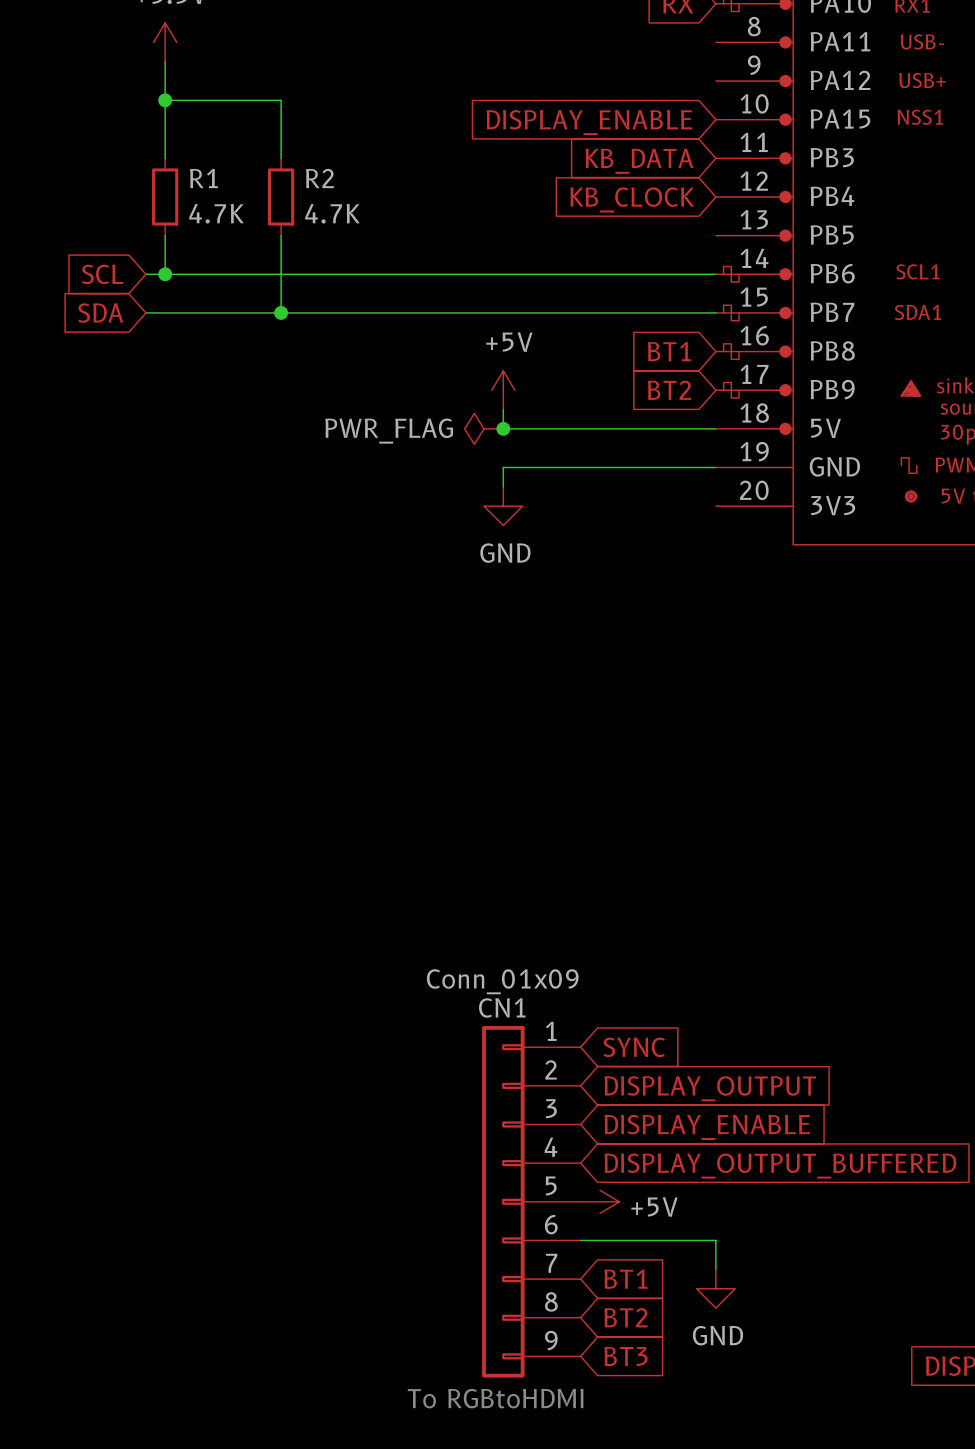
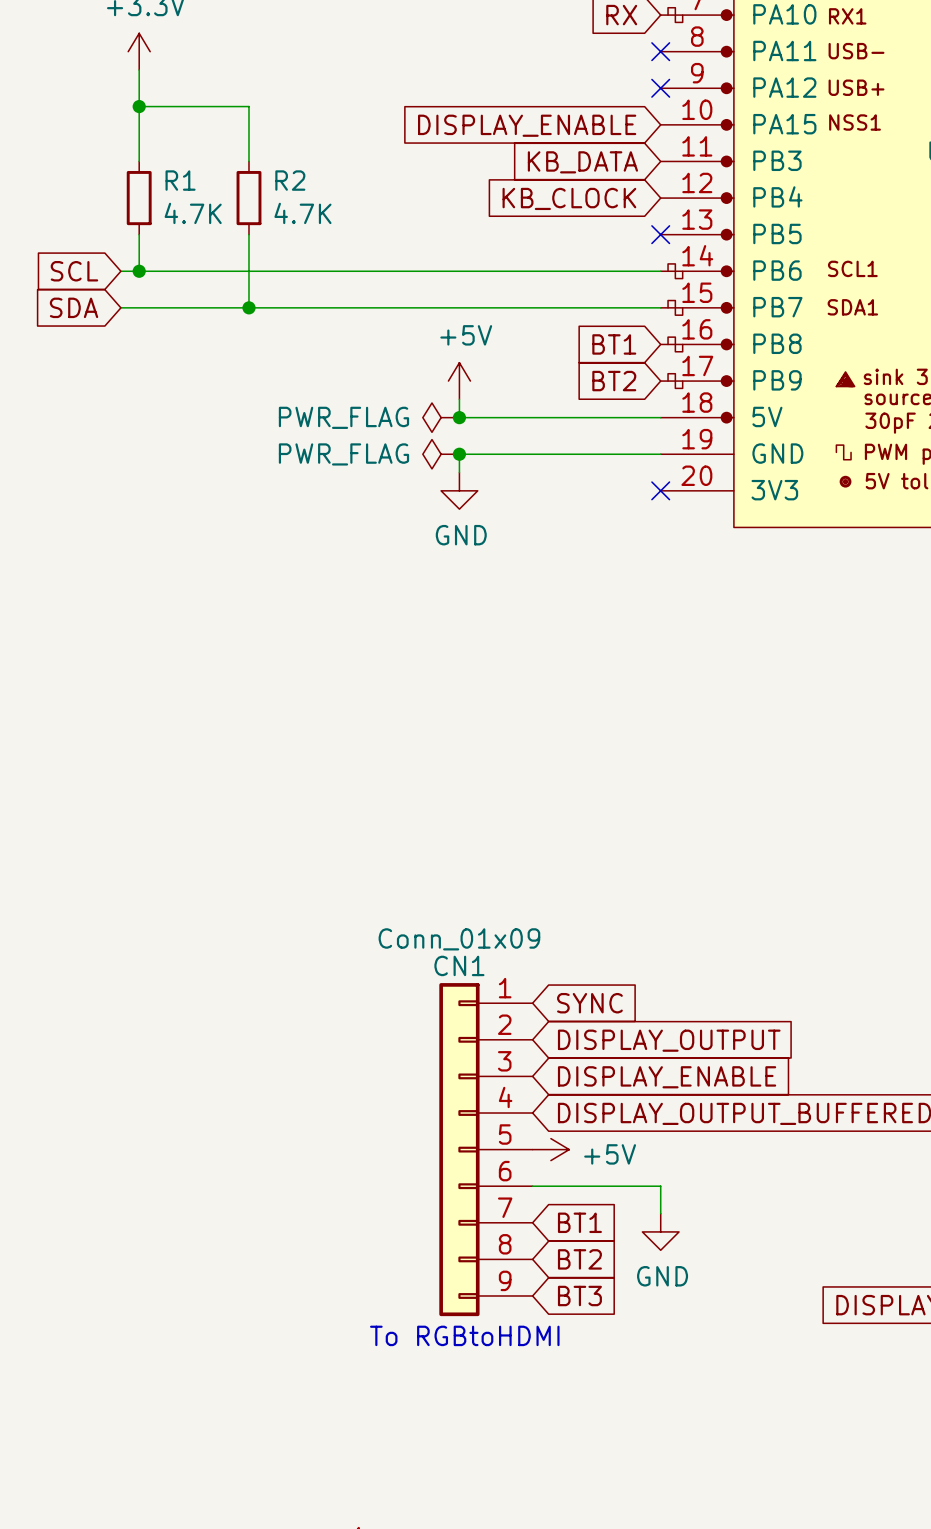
no-connect mark: none -> (660, 51)
no-connect mark: none -> (660, 88)
no-connect mark: none -> (660, 234)
power symbol: none -> PWR_FLAG (441, 454)
junction: none -> (459, 454)
no-connect mark: none -> (660, 490)

